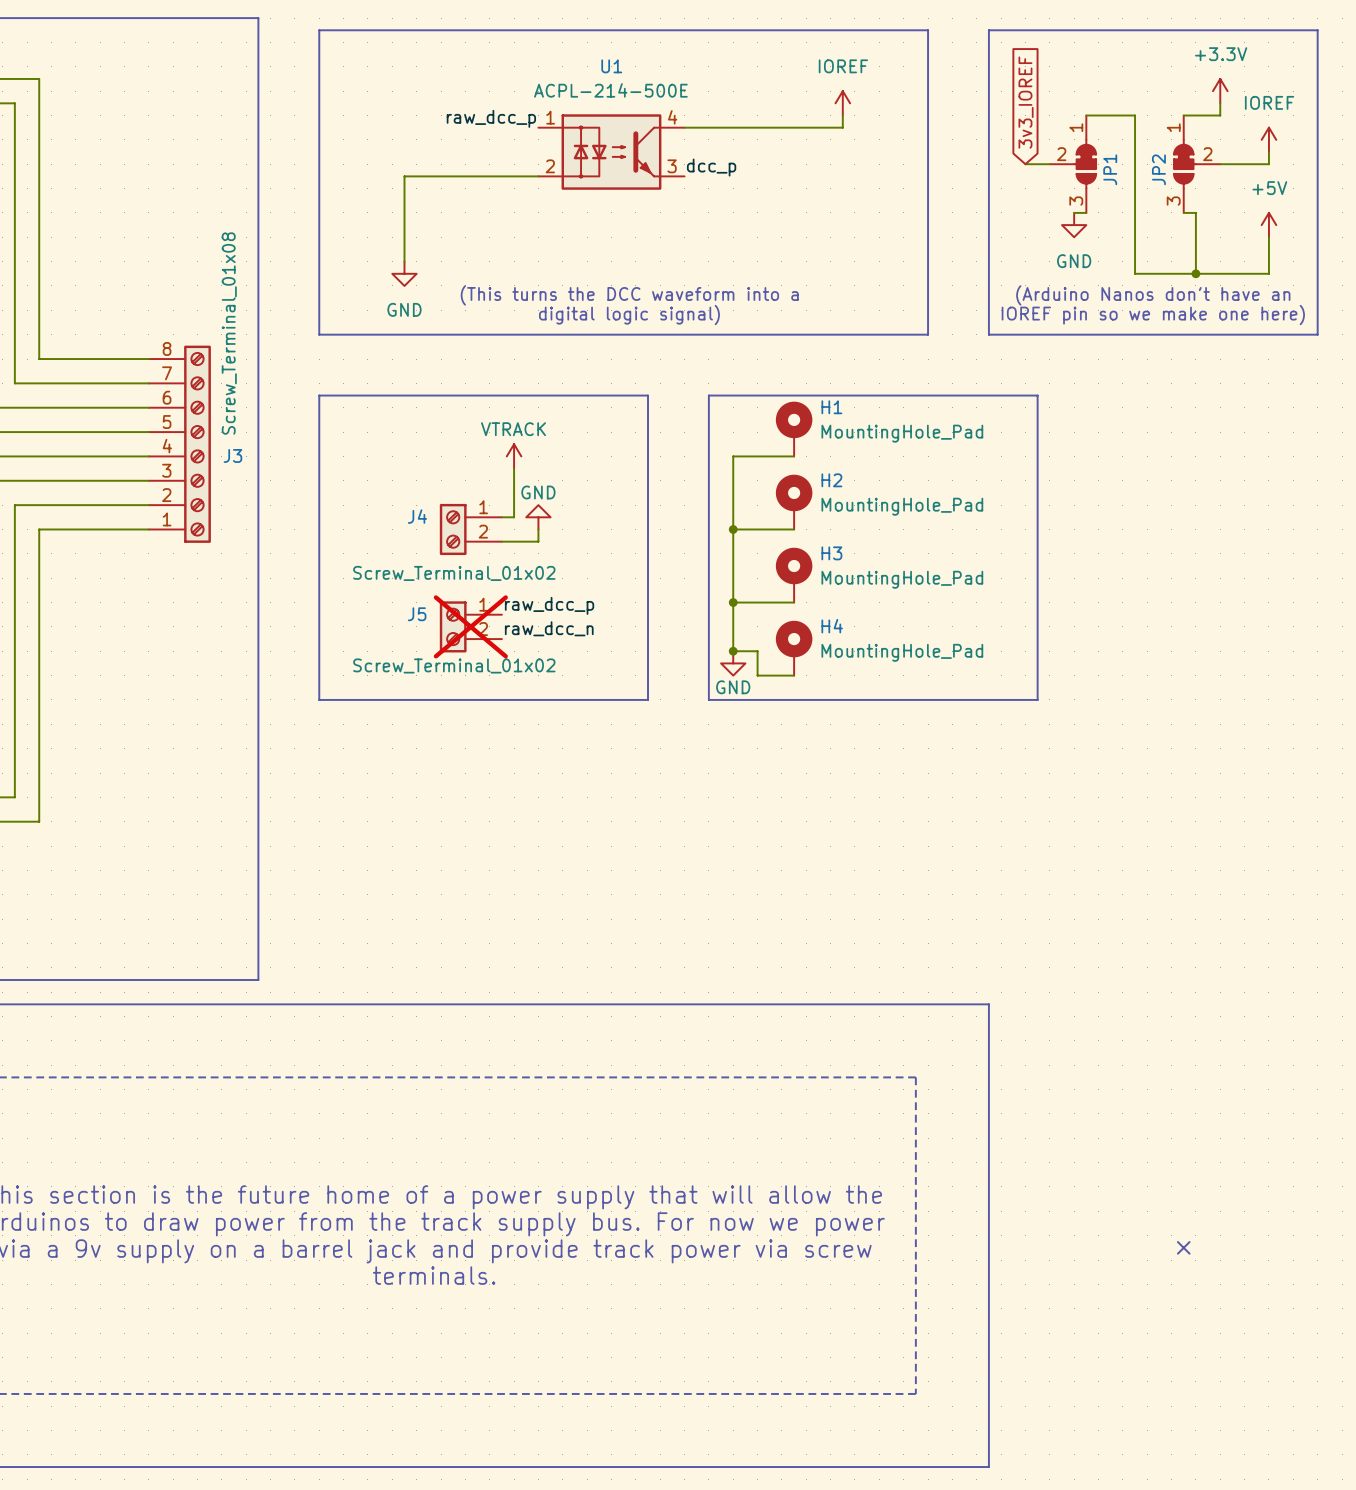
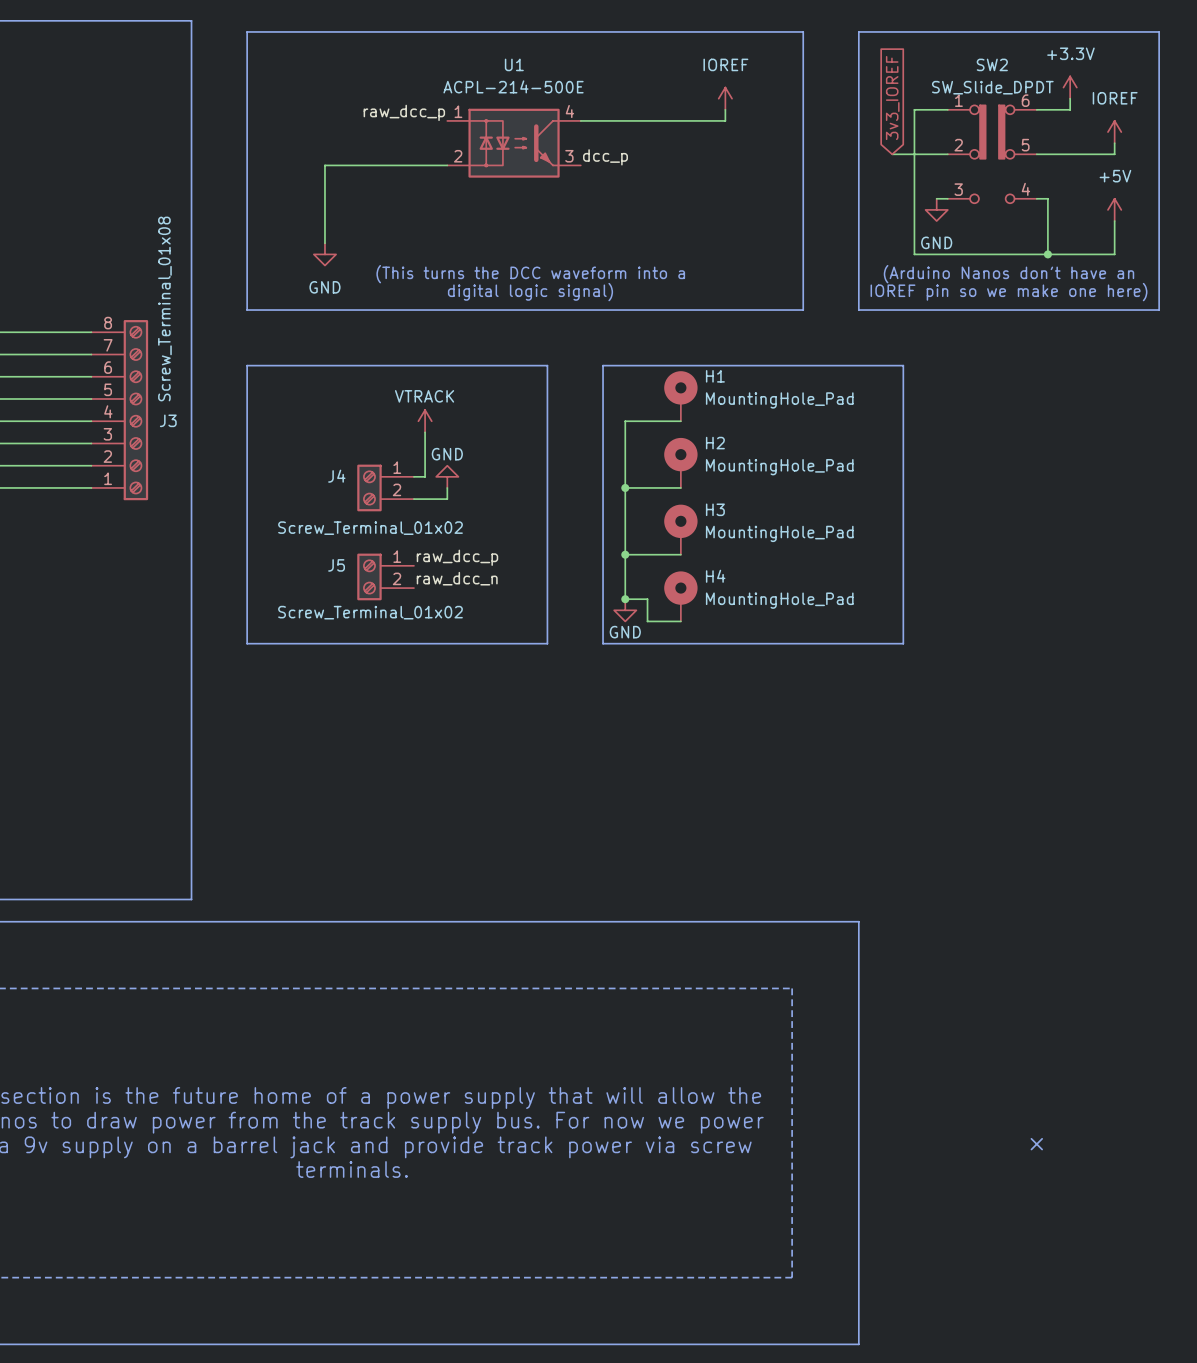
wire: (1086, 115) (1135, 115) (1135, 273) -> (947, 109) (914, 109) (914, 254) (992, 254)
JP1: (1072, 164) -> none
SW2: none -> SW_Slide_DPDT (992, 154)
JP2: (1197, 164) -> none
J5 do-not-place cross: (470, 626) -> none

